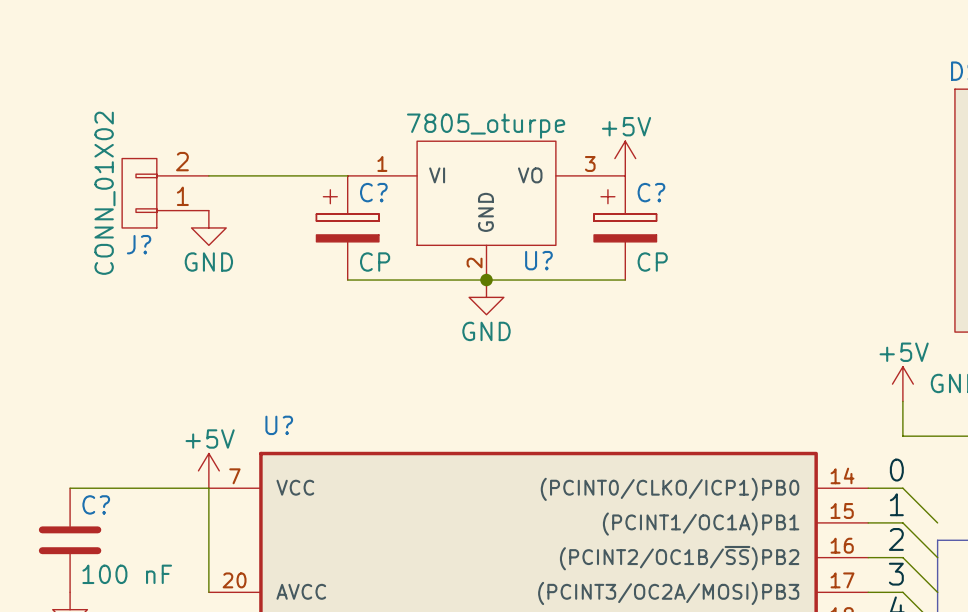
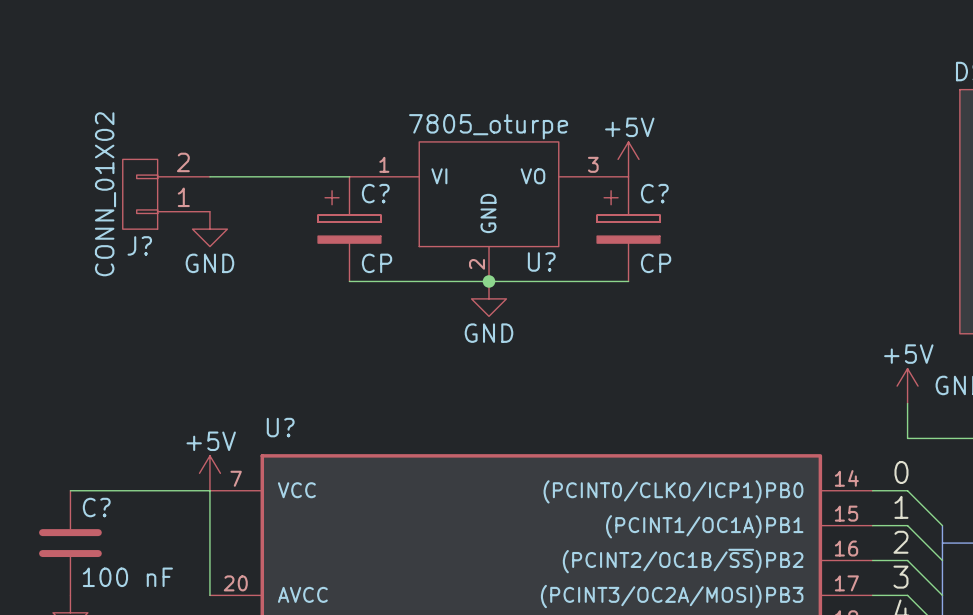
bus: none -> (942, 525) (942, 543)

